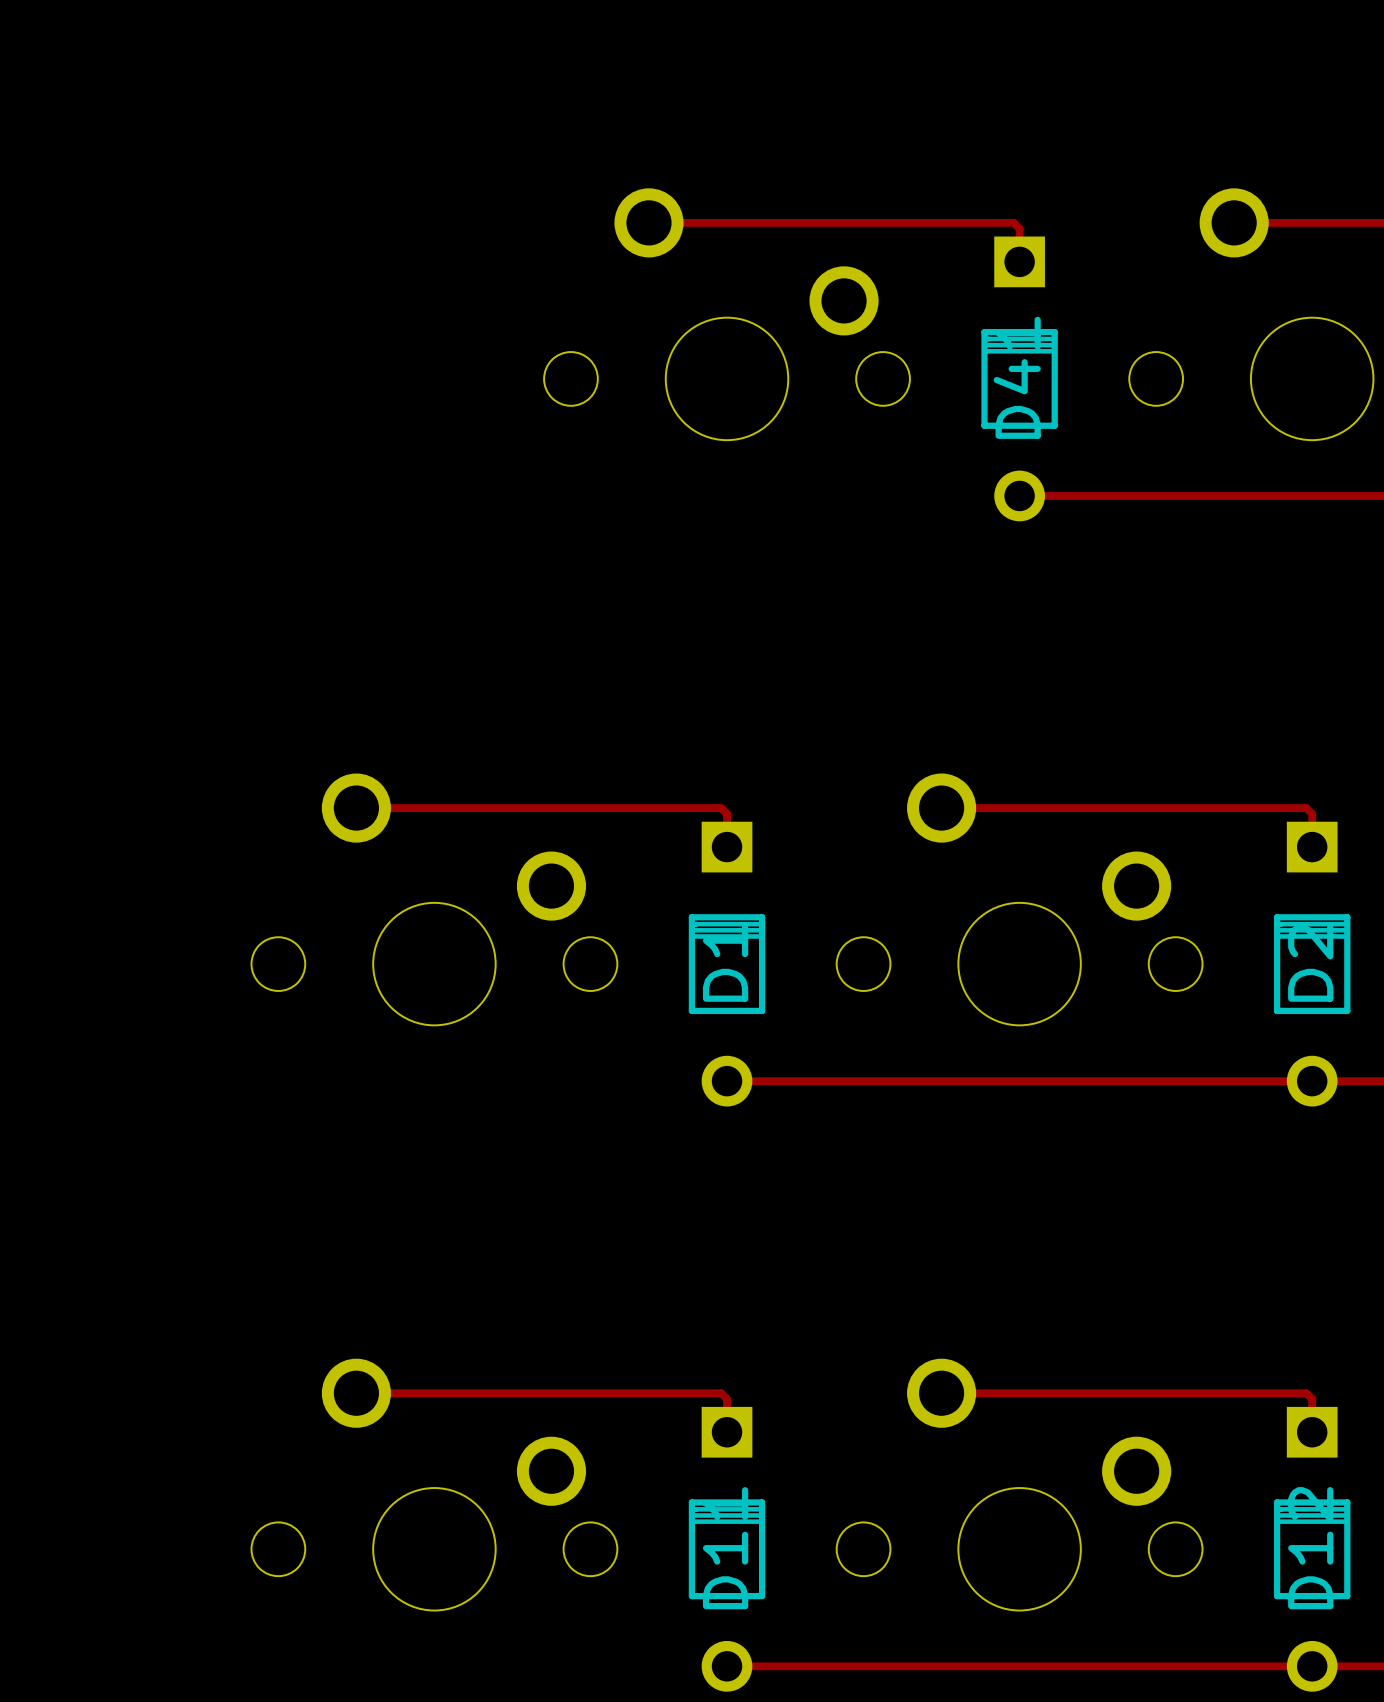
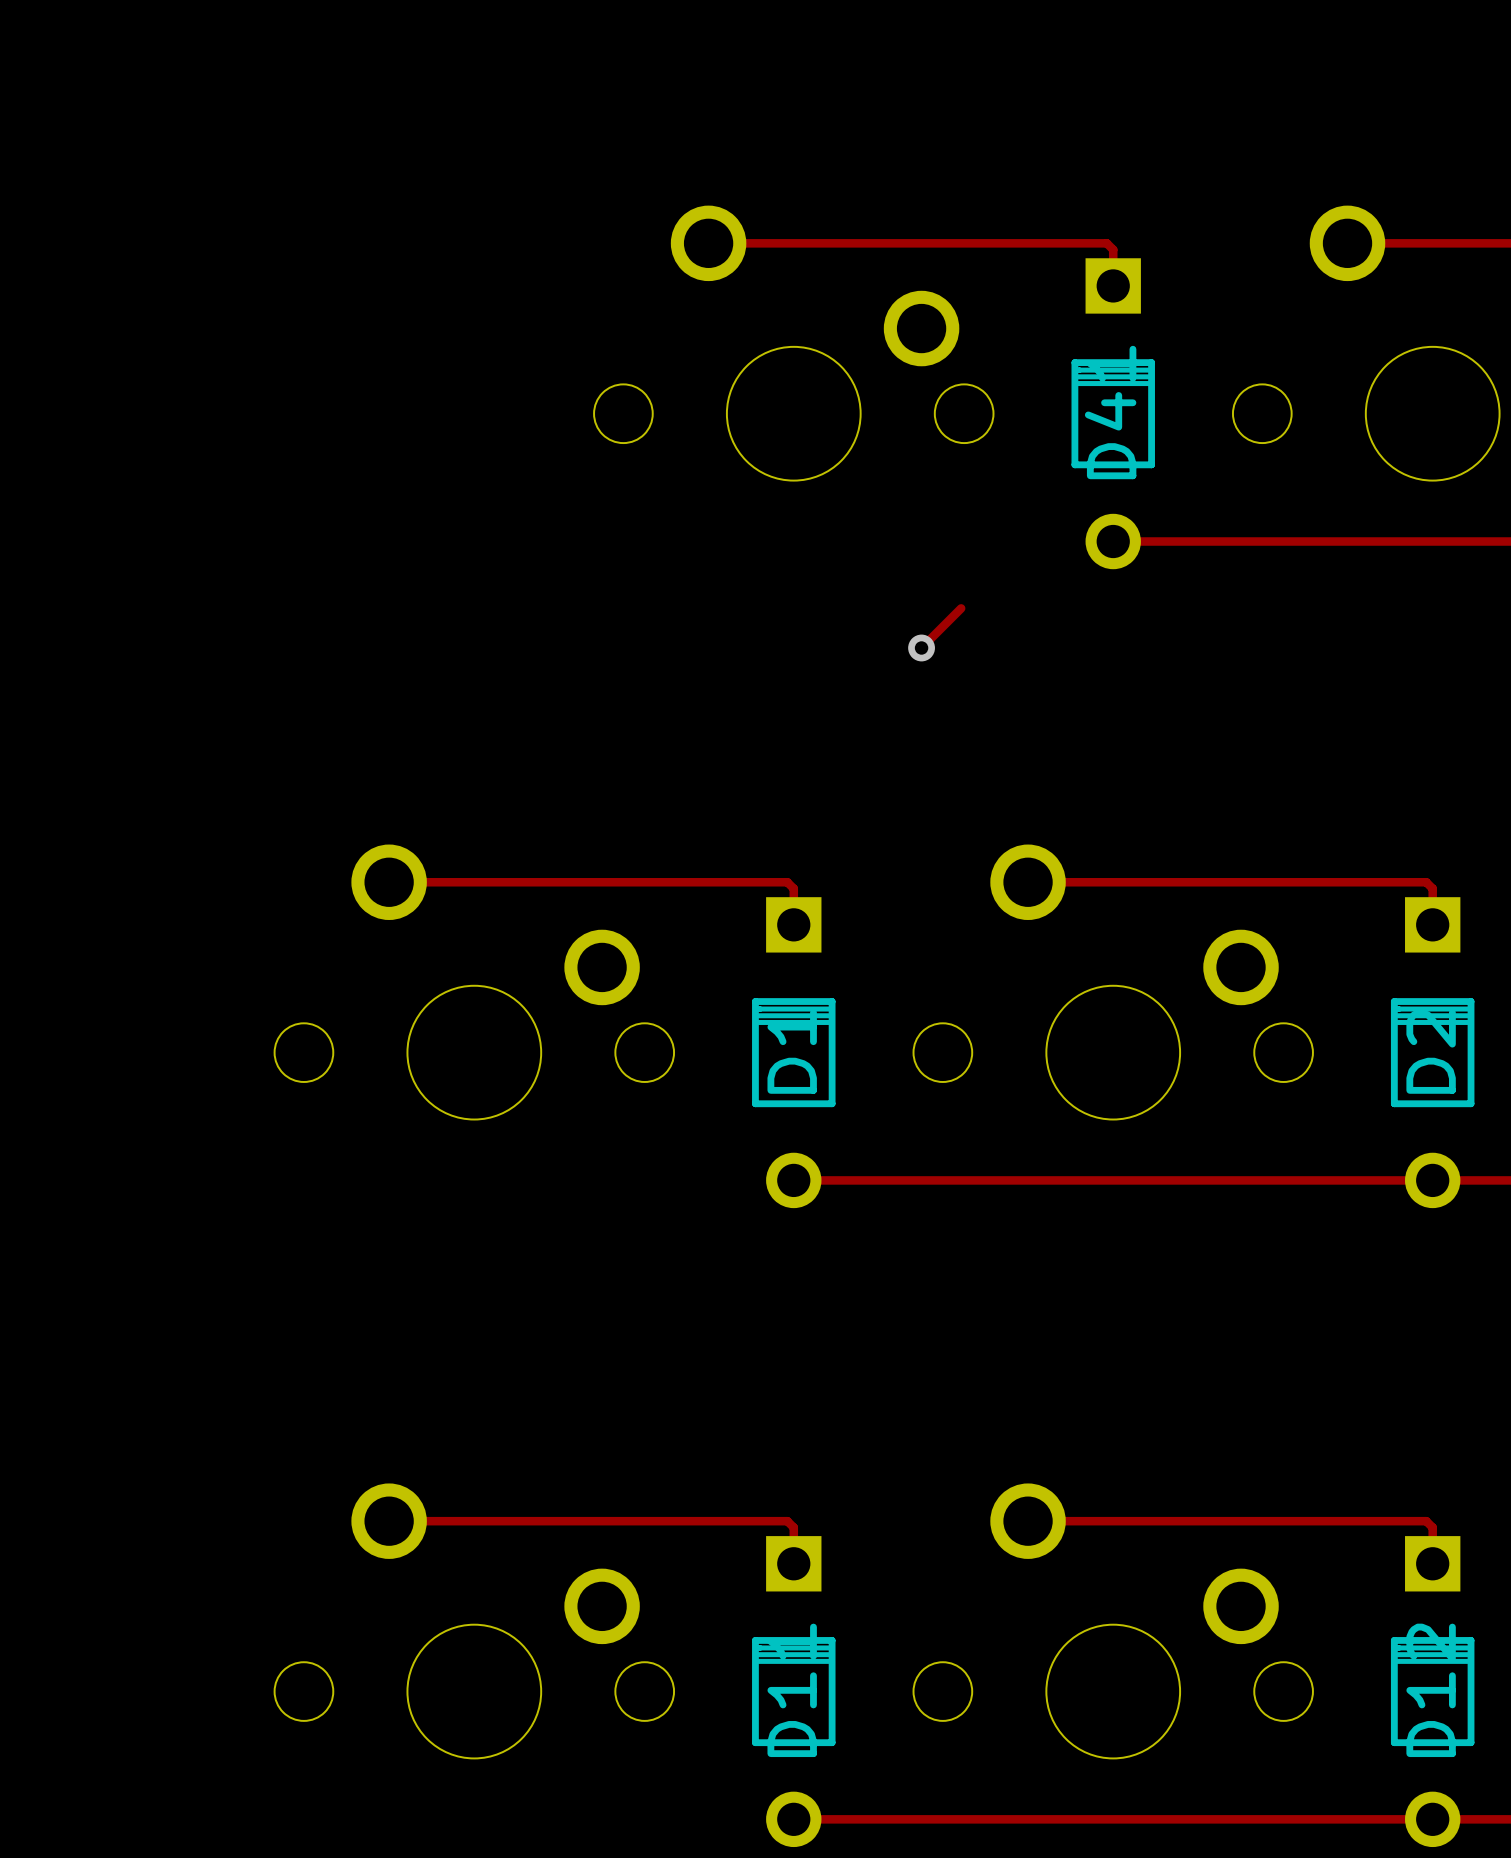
track: none -> (961, 608) (921, 647)
via: none -> (921, 647)

